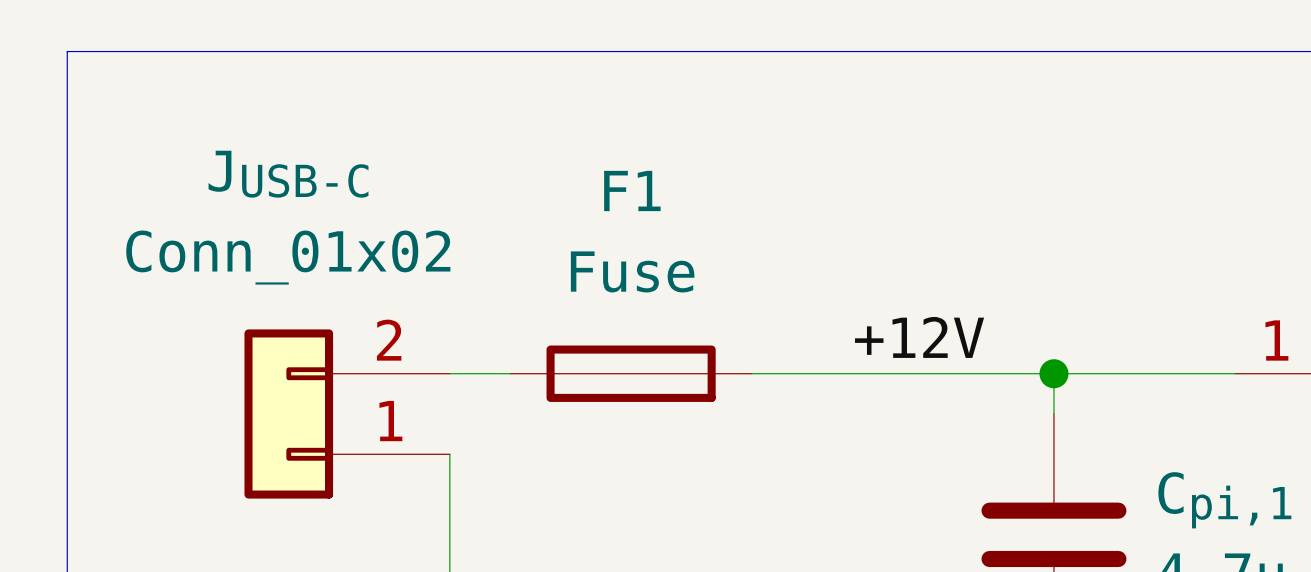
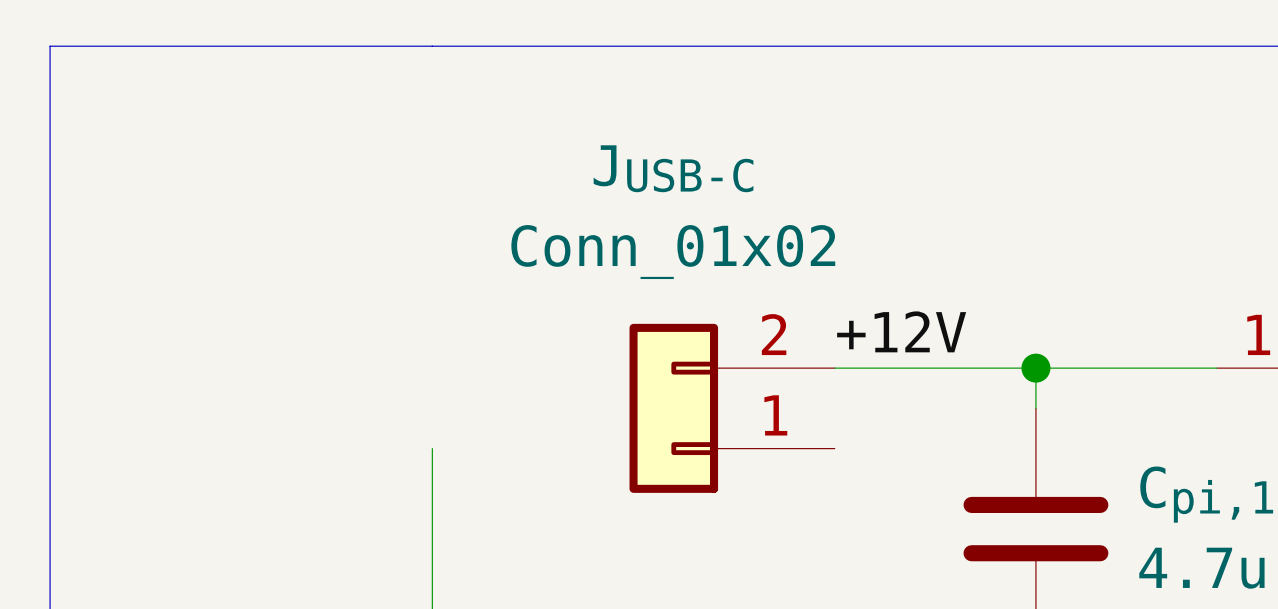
wire: (449, 373) (510, 373) -> none
F1: Fuse (631, 373) -> none
JUSB-C position: (347, 414) -> (732, 408)

